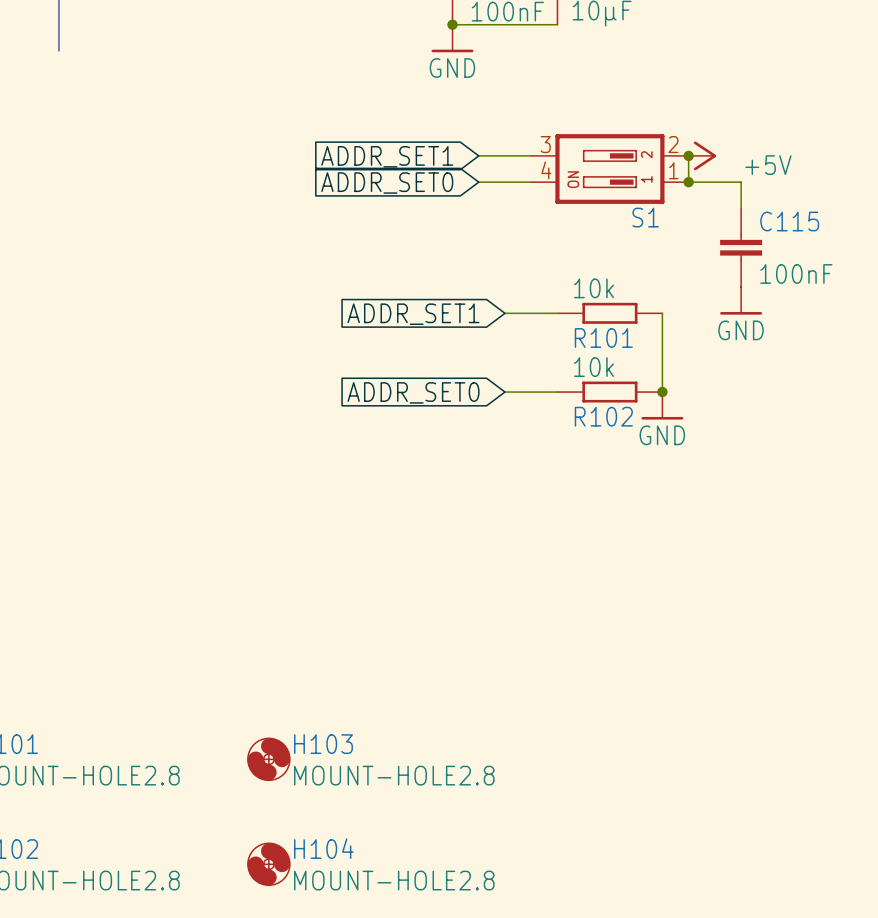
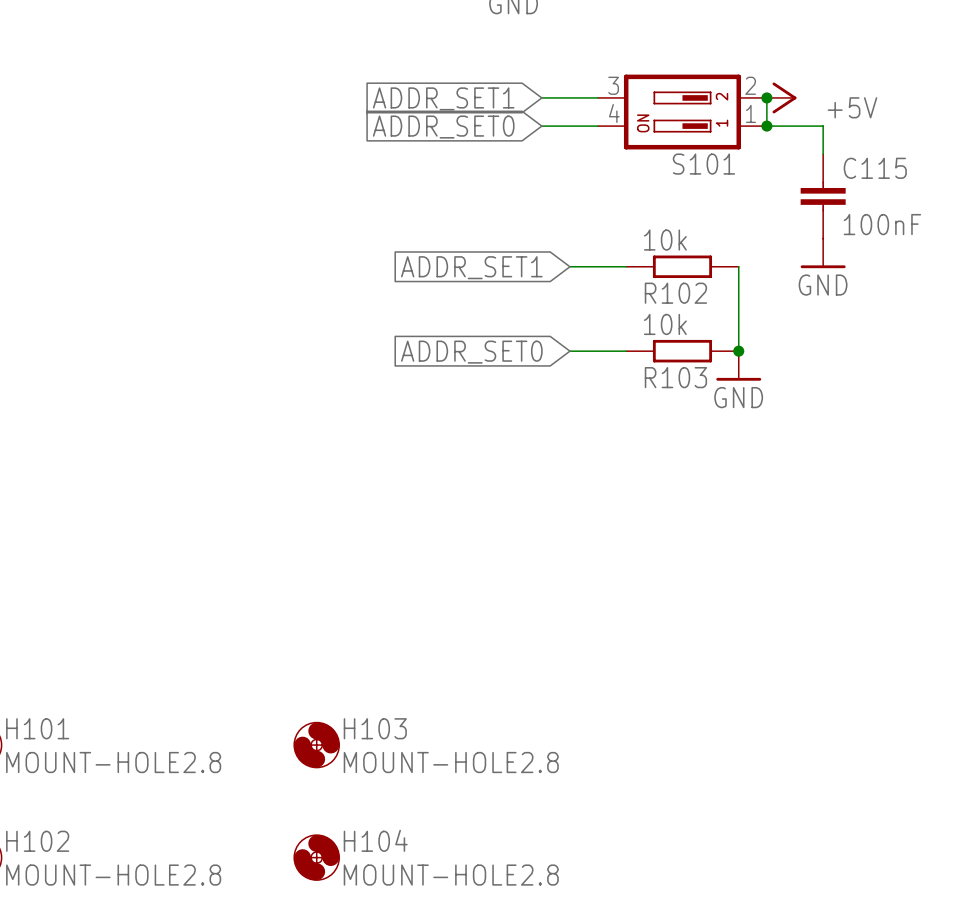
S1 name: S1 (645, 217) -> S101 (703, 164)
R101 name: R101 (603, 337) -> R102 (675, 293)
R102 name: R102 (603, 416) -> R103 (675, 377)

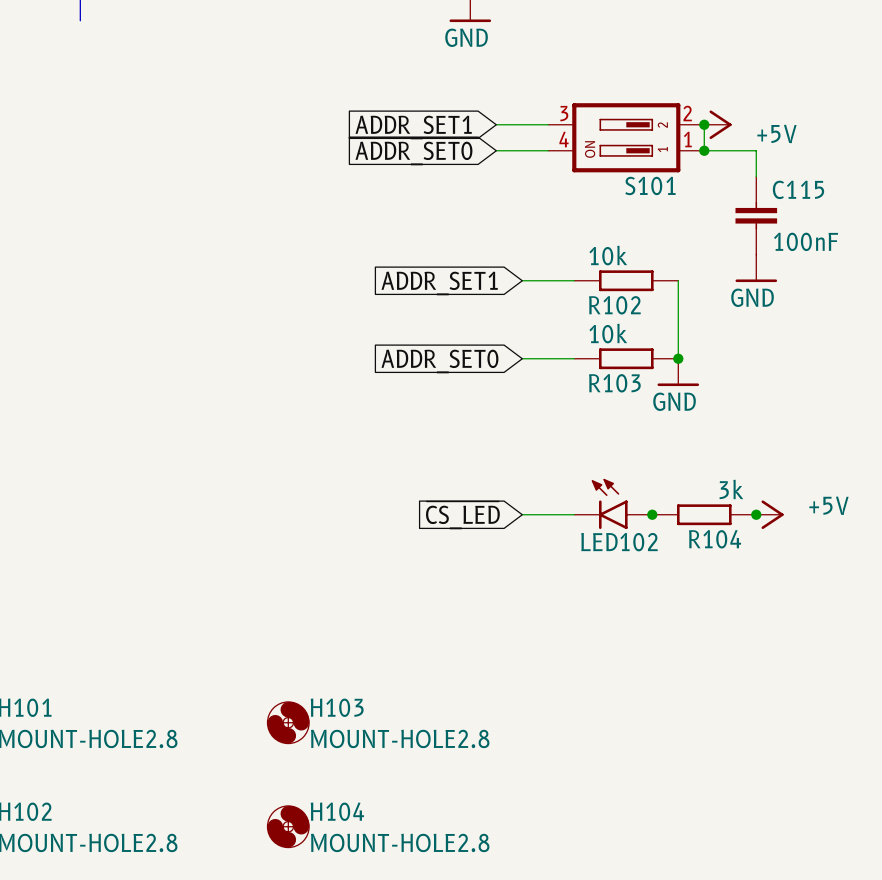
LED102: none -> (613, 503)
global label: none -> ~{CS_LED} (462, 515)
wire: none -> (522, 514) (574, 514)
junction: none -> (652, 514)
R104: none -> 3k (704, 514)
junction: none -> (756, 514)
power symbol: none -> +5V (769, 514)

